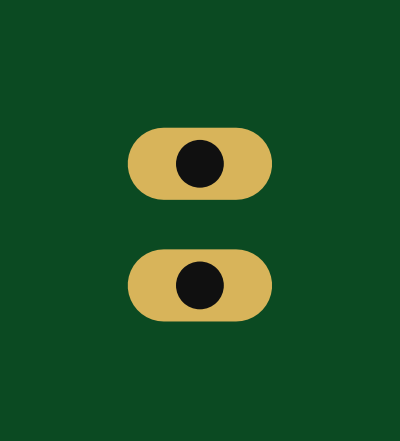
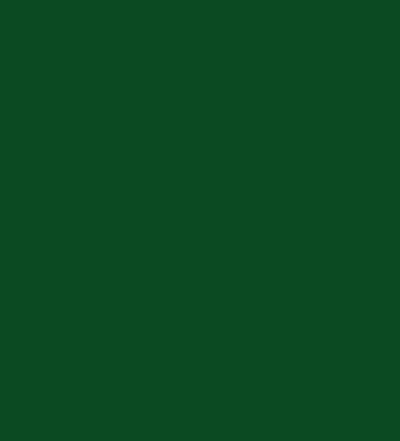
part: (199, 224) -> none

